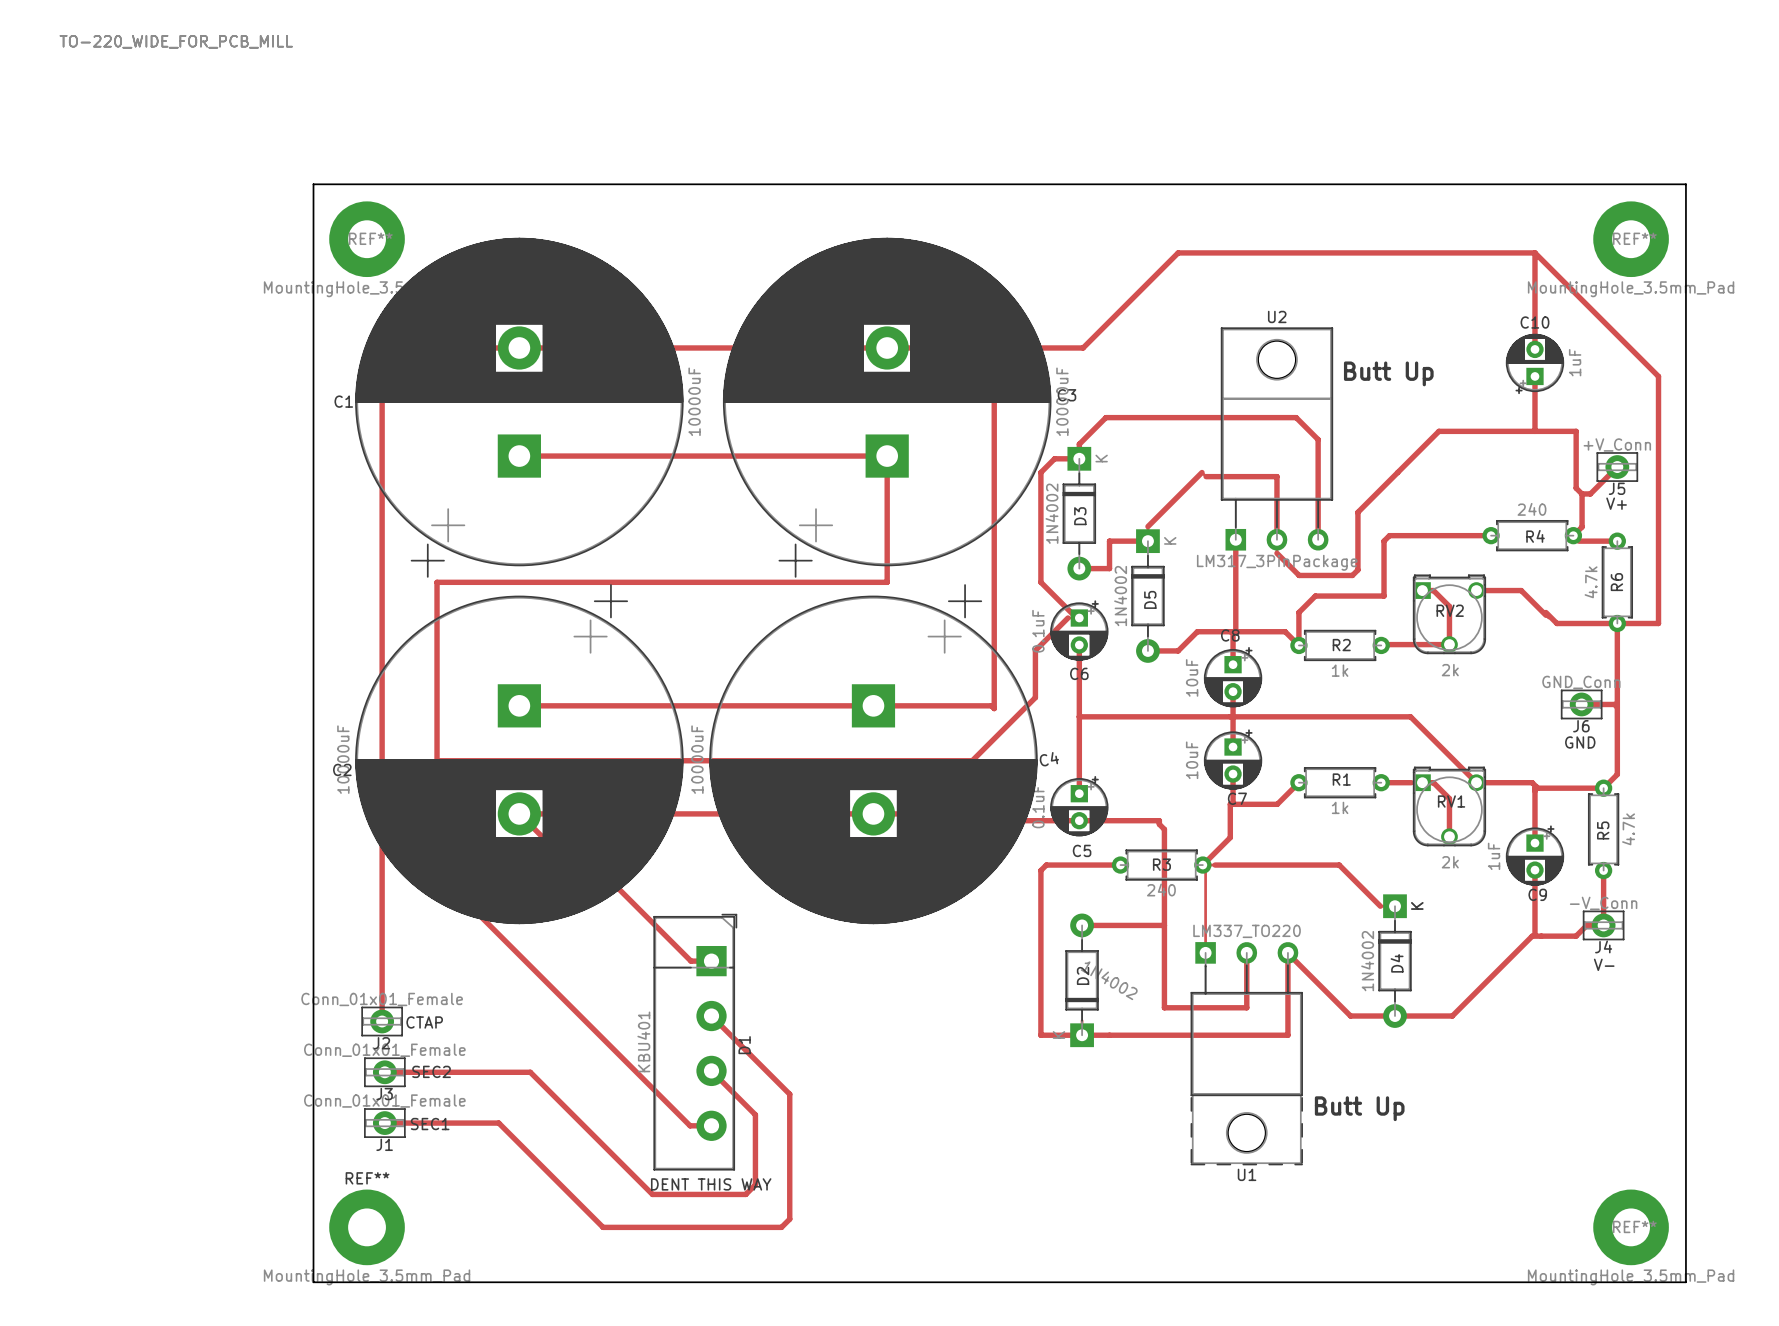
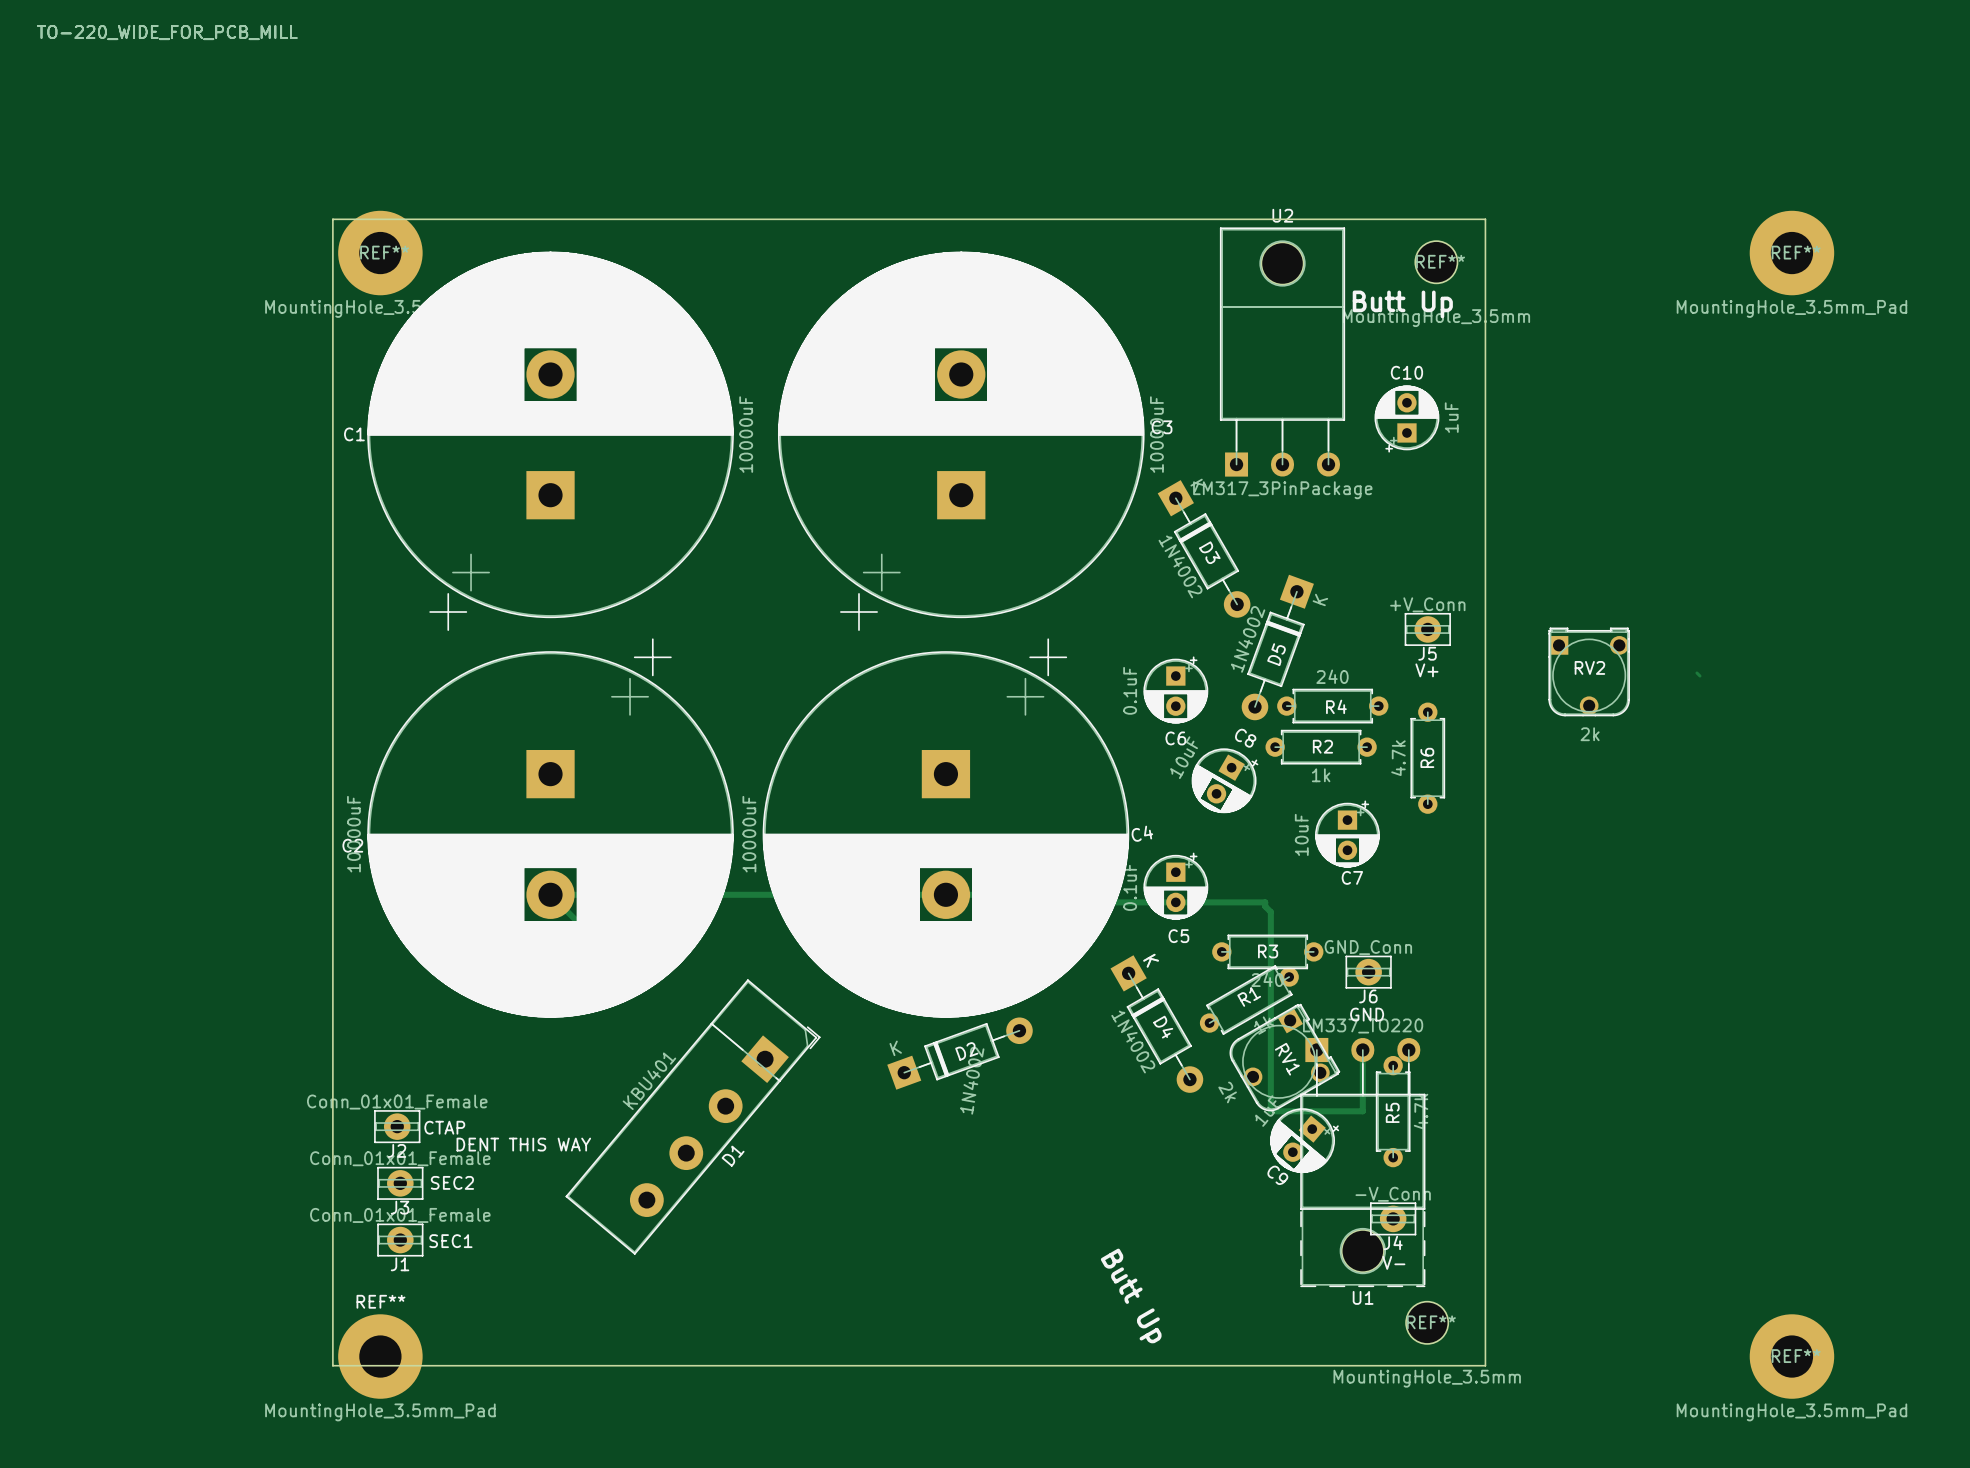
board edge: (313, 184) (1685, 184) (1685, 1282) (313, 1282) (313, 184) -> (332, 219) (332, 1365) (1485, 1365) (1485, 219) (332, 219)
REF**: none -> MountingHole_3.5mm (1436, 262)
track: (1534, 252) (1658, 376) (1658, 623) (1556, 623) (1521, 590) (1476, 590) -> none
track: (1534, 252) (1178, 252) (1083, 347) (383, 347) (382, 1021) -> none
track: (1534, 252) (1534, 349) -> none
track: (993, 347) (994, 708) (991, 705) (519, 705) -> none
C10 position: (1534, 363) -> (1406, 418)
text position: Butt Up (1388, 373) -> Butt Up (1402, 304)
track: (1534, 376) (1534, 431) -> none
U2 position: (1276, 439) -> (1282, 352)
track: (519, 456) (887, 456) (887, 582) (437, 582) (437, 872) (690, 1125) (711, 1125) -> none
track: (1617, 467) (1590, 493) (1582, 493) -> none
J5 position: (1617, 467) -> (1427, 629)
text: V+ (1616, 503) -> none
track: (1357, 512) (1438, 431) (1576, 431) (1576, 488) (1582, 494) (1582, 527) (1573, 535) (1578, 541) (1617, 541) -> none
track: (1357, 512) (1357, 569) (1352, 575) (1299, 575) (1276, 553) (1276, 476) (1206, 476) (1201, 472) (1147, 526) (1147, 541) (1109, 541) (1109, 568) (1079, 568) -> none
D3 rotation: 0° (1079, 513) -> 30° counterclockwise (1204, 548)
track: (1491, 535) (1389, 535) (1384, 541) (1384, 596) (1315, 596) (1298, 612) (1298, 645) (1285, 631) (1197, 631) (1178, 650) (1147, 650) -> none
R4 position: (1532, 535) -> (1332, 706)
track: (1235, 539) (1235, 631) (1233, 634) -> none
track: (1318, 539) (1318, 439) (1296, 417) (1105, 417) (1079, 444) (1079, 458) (1054, 458) (1040, 472) (1040, 582) (1076, 618) (1067, 618) (1035, 650) (1035, 697) (972, 760) (437, 760) -> none
R6 position: (1617, 582) -> (1427, 758)
track: (1422, 590) (1433, 590) (1449, 606) (1449, 644) (1381, 645) -> none
D5 rotation: 0° (1147, 596) -> 20° clockwise (1277, 647)
text: none -> V+ (1426, 670)
track: (1617, 623) (1617, 774) (1603, 788) (1537, 788) -> none
track: (1233, 634) (1233, 664) -> none
track: (1079, 645) (1079, 793) -> none
R2 position: (1340, 645) -> (1321, 747)
C8 rotation: 0° (1233, 677) -> 30° clockwise (1224, 780)
C8 position: (1233, 677) -> (1224, 780)
track: (1233, 691) (1233, 714) (1230, 716) (1233, 719) (1233, 747) -> none
track: (1581, 704) (1614, 704) (1617, 707) -> none
J6 position: (1581, 704) -> (1368, 972)
track: (1079, 716) (1410, 716) (1476, 782) (1532, 782) (1537, 788) -> none
text: GND (1580, 742) -> none
track: (1233, 774) (1233, 801) (1230, 804) -> none
track: (1298, 782) (1277, 804) (1230, 804) -> none
R1 rotation: 0° (1340, 782) -> 30° counterclockwise (1249, 1000)
R1 position: (1340, 782) -> (1249, 1000)
track: (1381, 782) (1433, 782) (1449, 798) (1449, 836) -> none
track: (1536, 786) (1534, 843) -> none
track: (1230, 804) (1230, 837) (1202, 865) -> none
RV1 rotation: 0° (1449, 806) -> 60° clockwise (1284, 1057)
RV1 position: (1449, 806) -> (1284, 1057)
R5 position: (1603, 829) -> (1393, 1111)
track: (561, 855) (585, 855) (690, 961) (711, 961) -> none
C9 rotation: 0° (1534, 855) -> 40° clockwise (1304, 1140)
C9 position: (1534, 855) -> (1304, 1140)
track: (1120, 865) (1046, 865) (1040, 870) (1040, 1035) (1287, 1035) (1287, 952) (1350, 1016) (1452, 1016) (1532, 936) -> none
track: (1202, 865) (1339, 865) (1380, 906) (1395, 906) -> none
track: (1202, 865) (1205, 867) (1205, 952) -> none
track: (1534, 870) (1534, 933) (1532, 936) -> none
track: (1603, 870) (1603, 925) (1586, 925) (1576, 936) (1532, 936) -> none
text: none -> GND (1367, 1014)
track: (1082, 925) (1164, 925) -> none
J4 position: (1603, 925) -> (1393, 1218)
D4 rotation: 0° (1395, 961) -> 30° counterclockwise (1156, 1024)
D4 position: (1395, 961) -> (1156, 1024)
text: V- (1604, 964) -> none
D2 rotation: 0° (1082, 980) -> 70° clockwise (959, 1053)
D2 position: (1082, 980) -> (959, 1053)
track: (711, 1016) (789, 1094) (789, 1219) (781, 1227) (603, 1227) (498, 1123) (384, 1123) -> none
D1 rotation: 0° (695, 1042) -> 40° clockwise (693, 1117)
track: (711, 1070) (755, 1114) (755, 1184) (745, 1194) (652, 1194) (530, 1072) (384, 1072) -> none
text: Butt Up (1359, 1108) -> none
text: none -> V- (1393, 1262)
text: none -> Butt Up (1131, 1295)
text position: DENT THIS WAY (711, 1184) -> DENT THIS WAY (523, 1144)
REF**: none -> MountingHole_3.5mm (1427, 1322)

